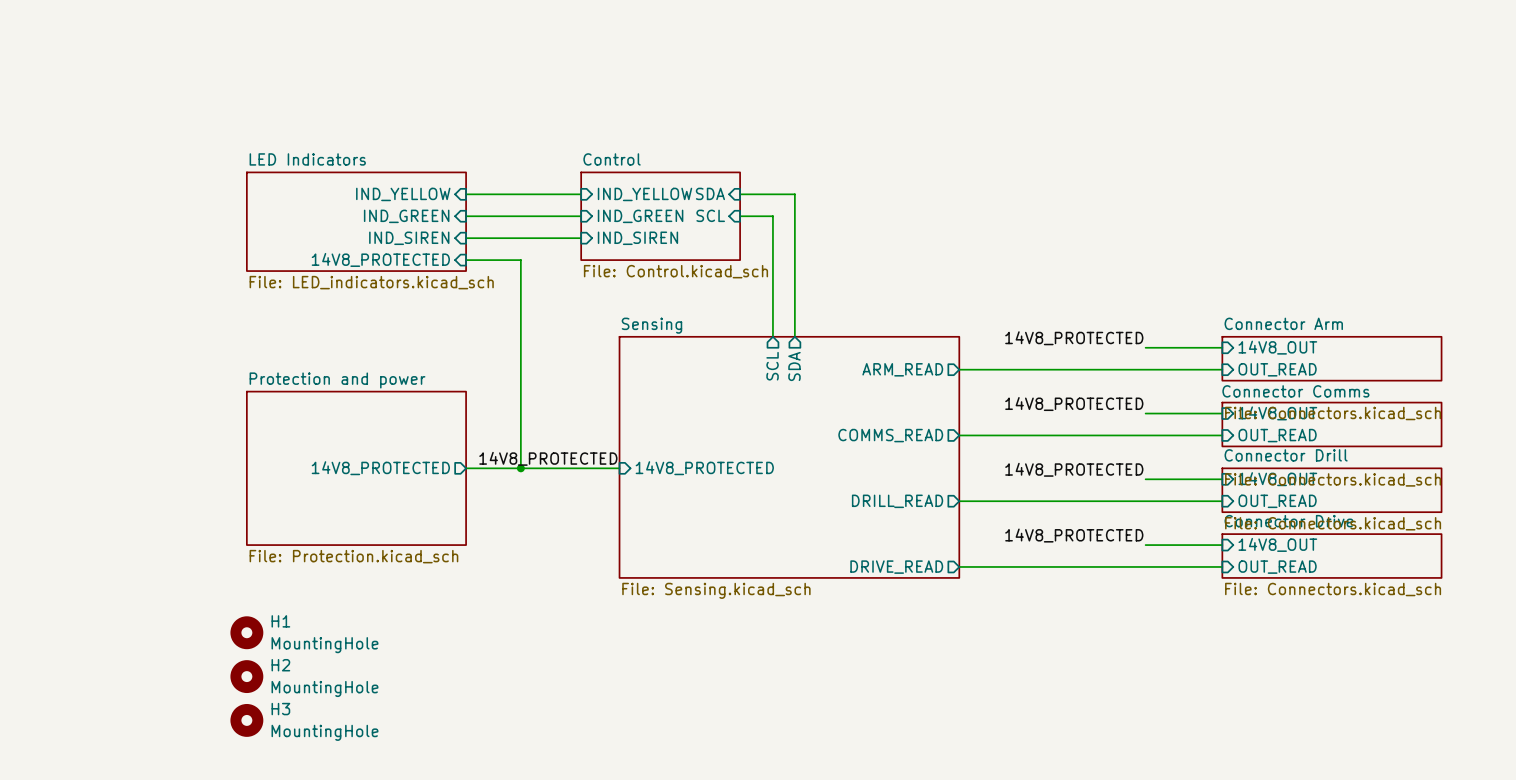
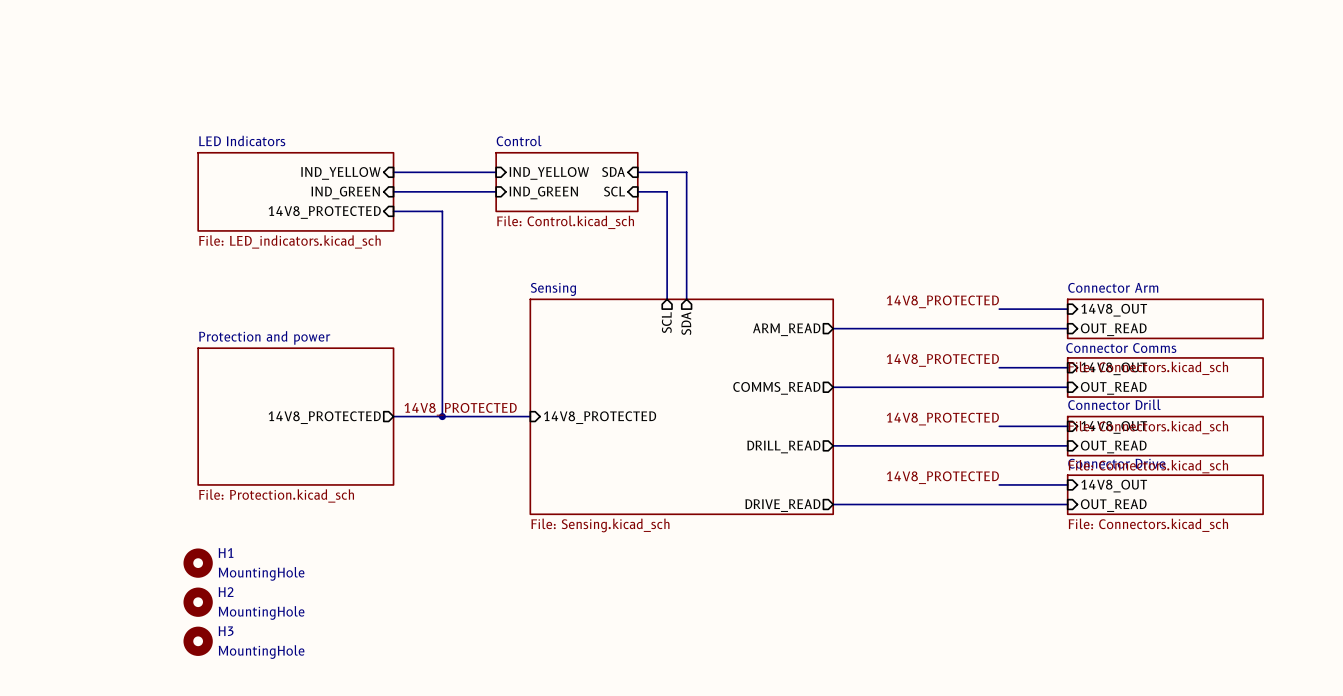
sheet LED Indicators shape: [246, 171, 467, 272] -> [197, 152, 395, 232]
sheet Control: none -> File: Control.kicad_sch (566, 182)
sheet Control: File: Control.kicad_sch (660, 216) -> none
sheet pin: IND_SIREN (409, 238) -> 14V8_PROTECTED (324, 212)
wire: (520, 238) (581, 238) -> none
sheet pin: IND_SIREN (637, 238) -> none
sheet pin: 14V8_PROTECTED (380, 259) -> none
wire: (466, 260) (520, 260) -> (442, 211) (442, 230)

